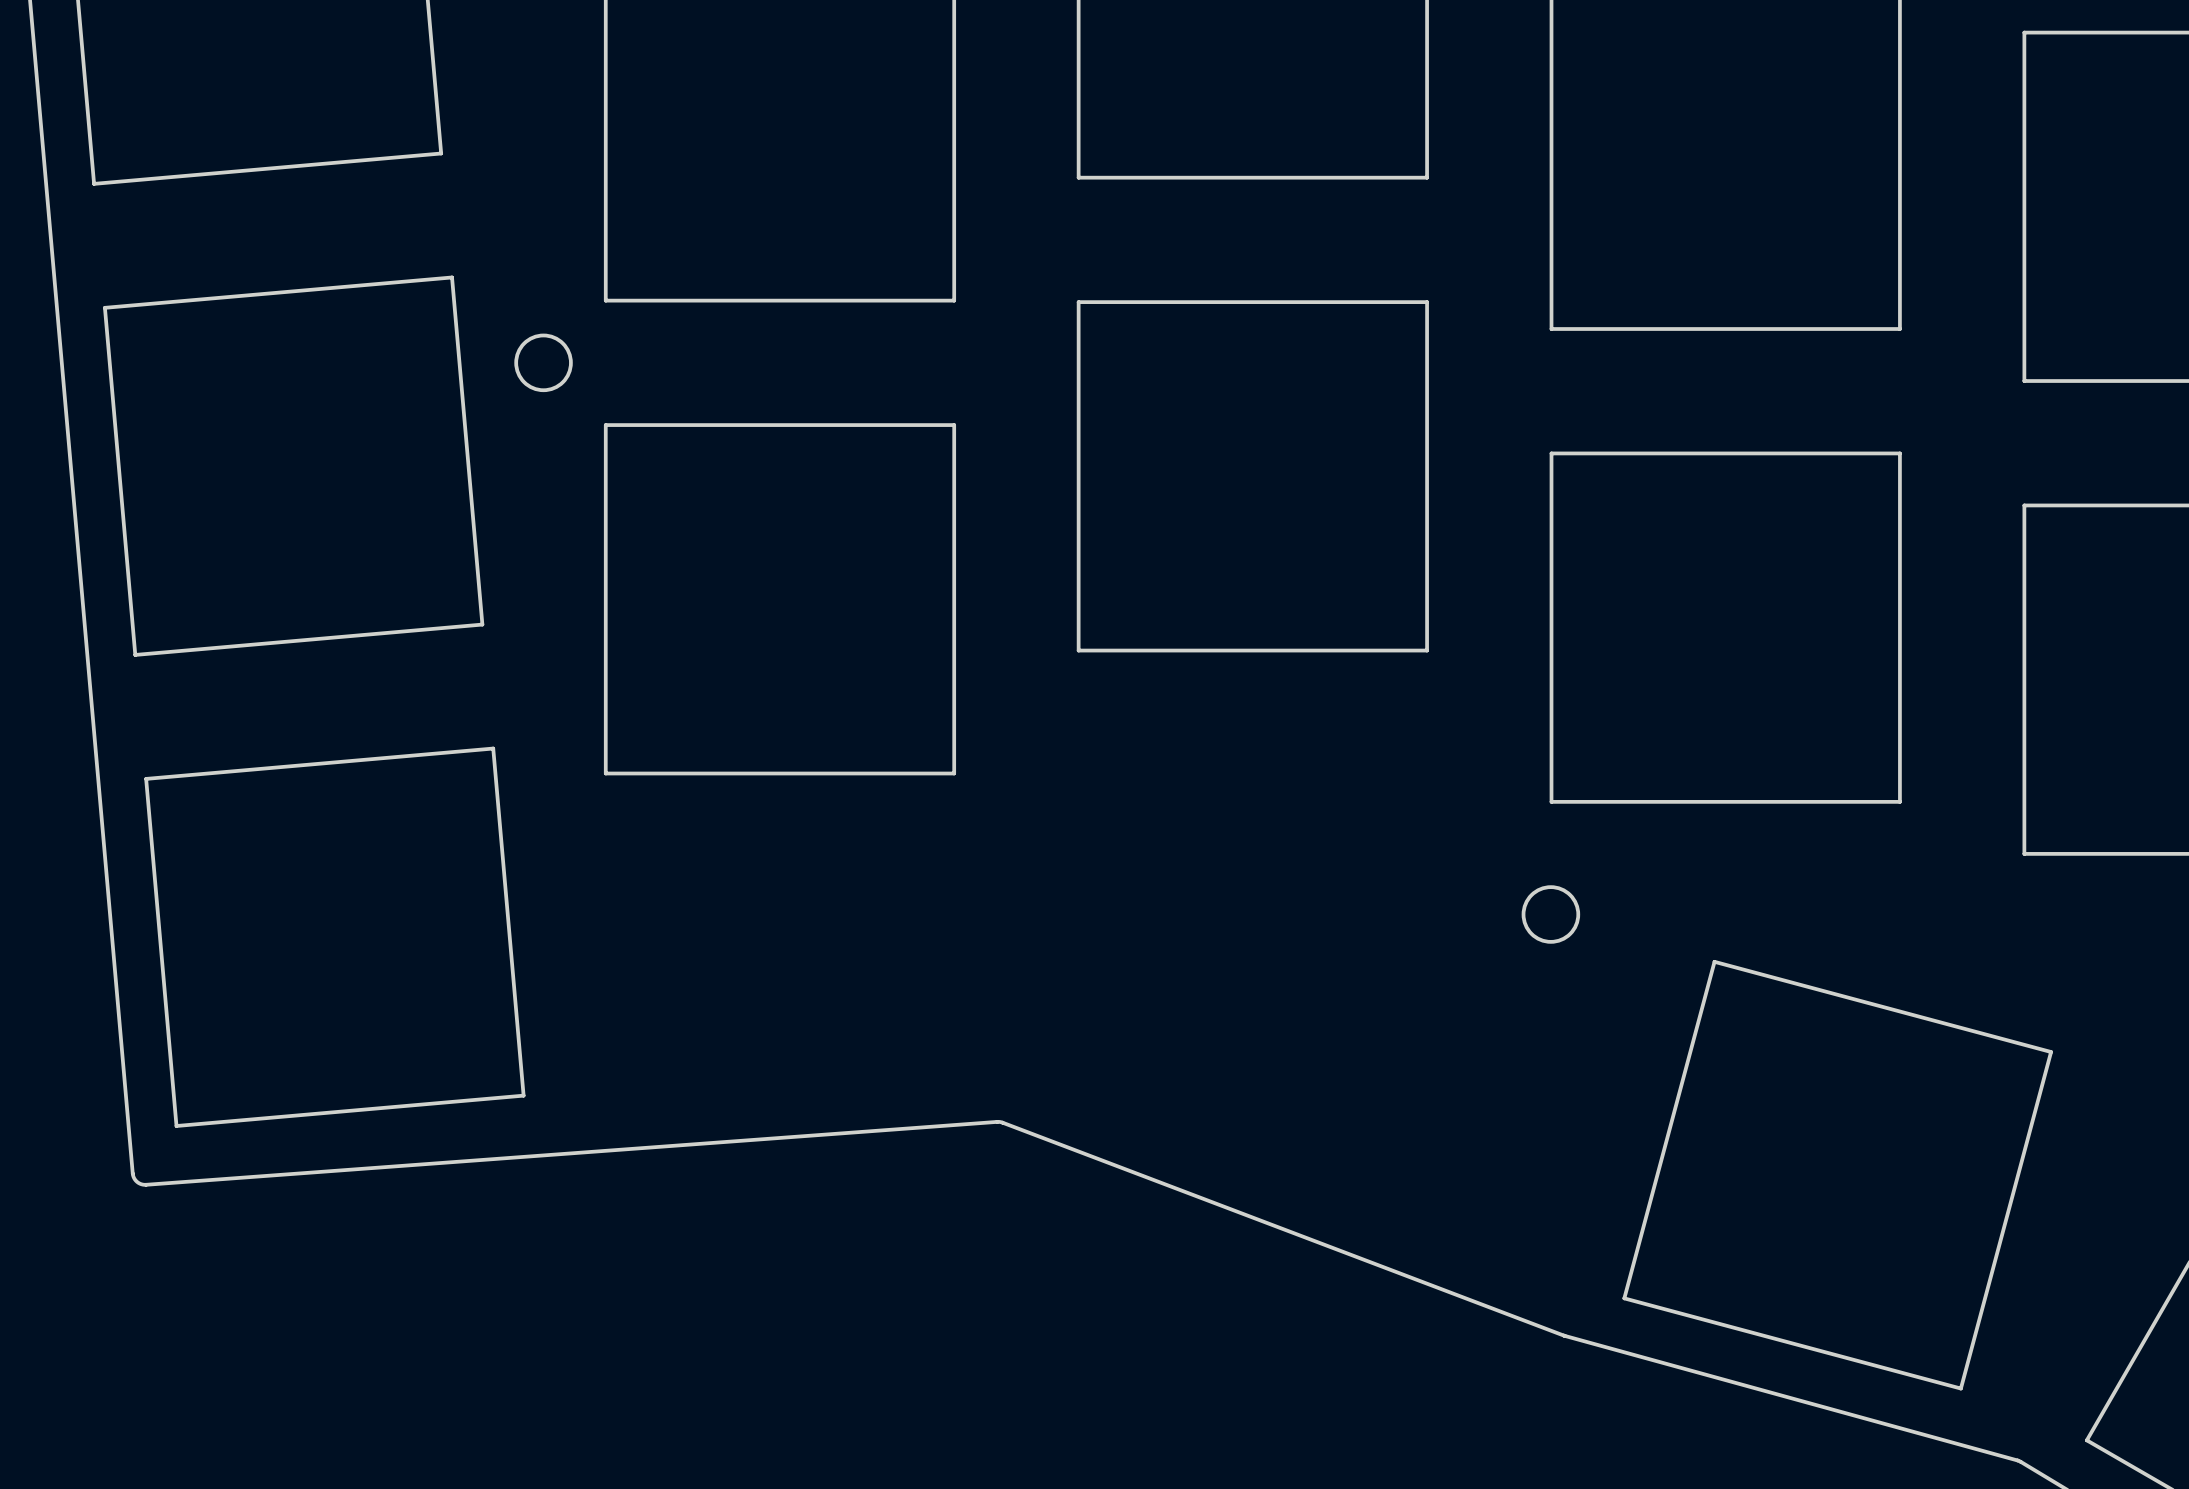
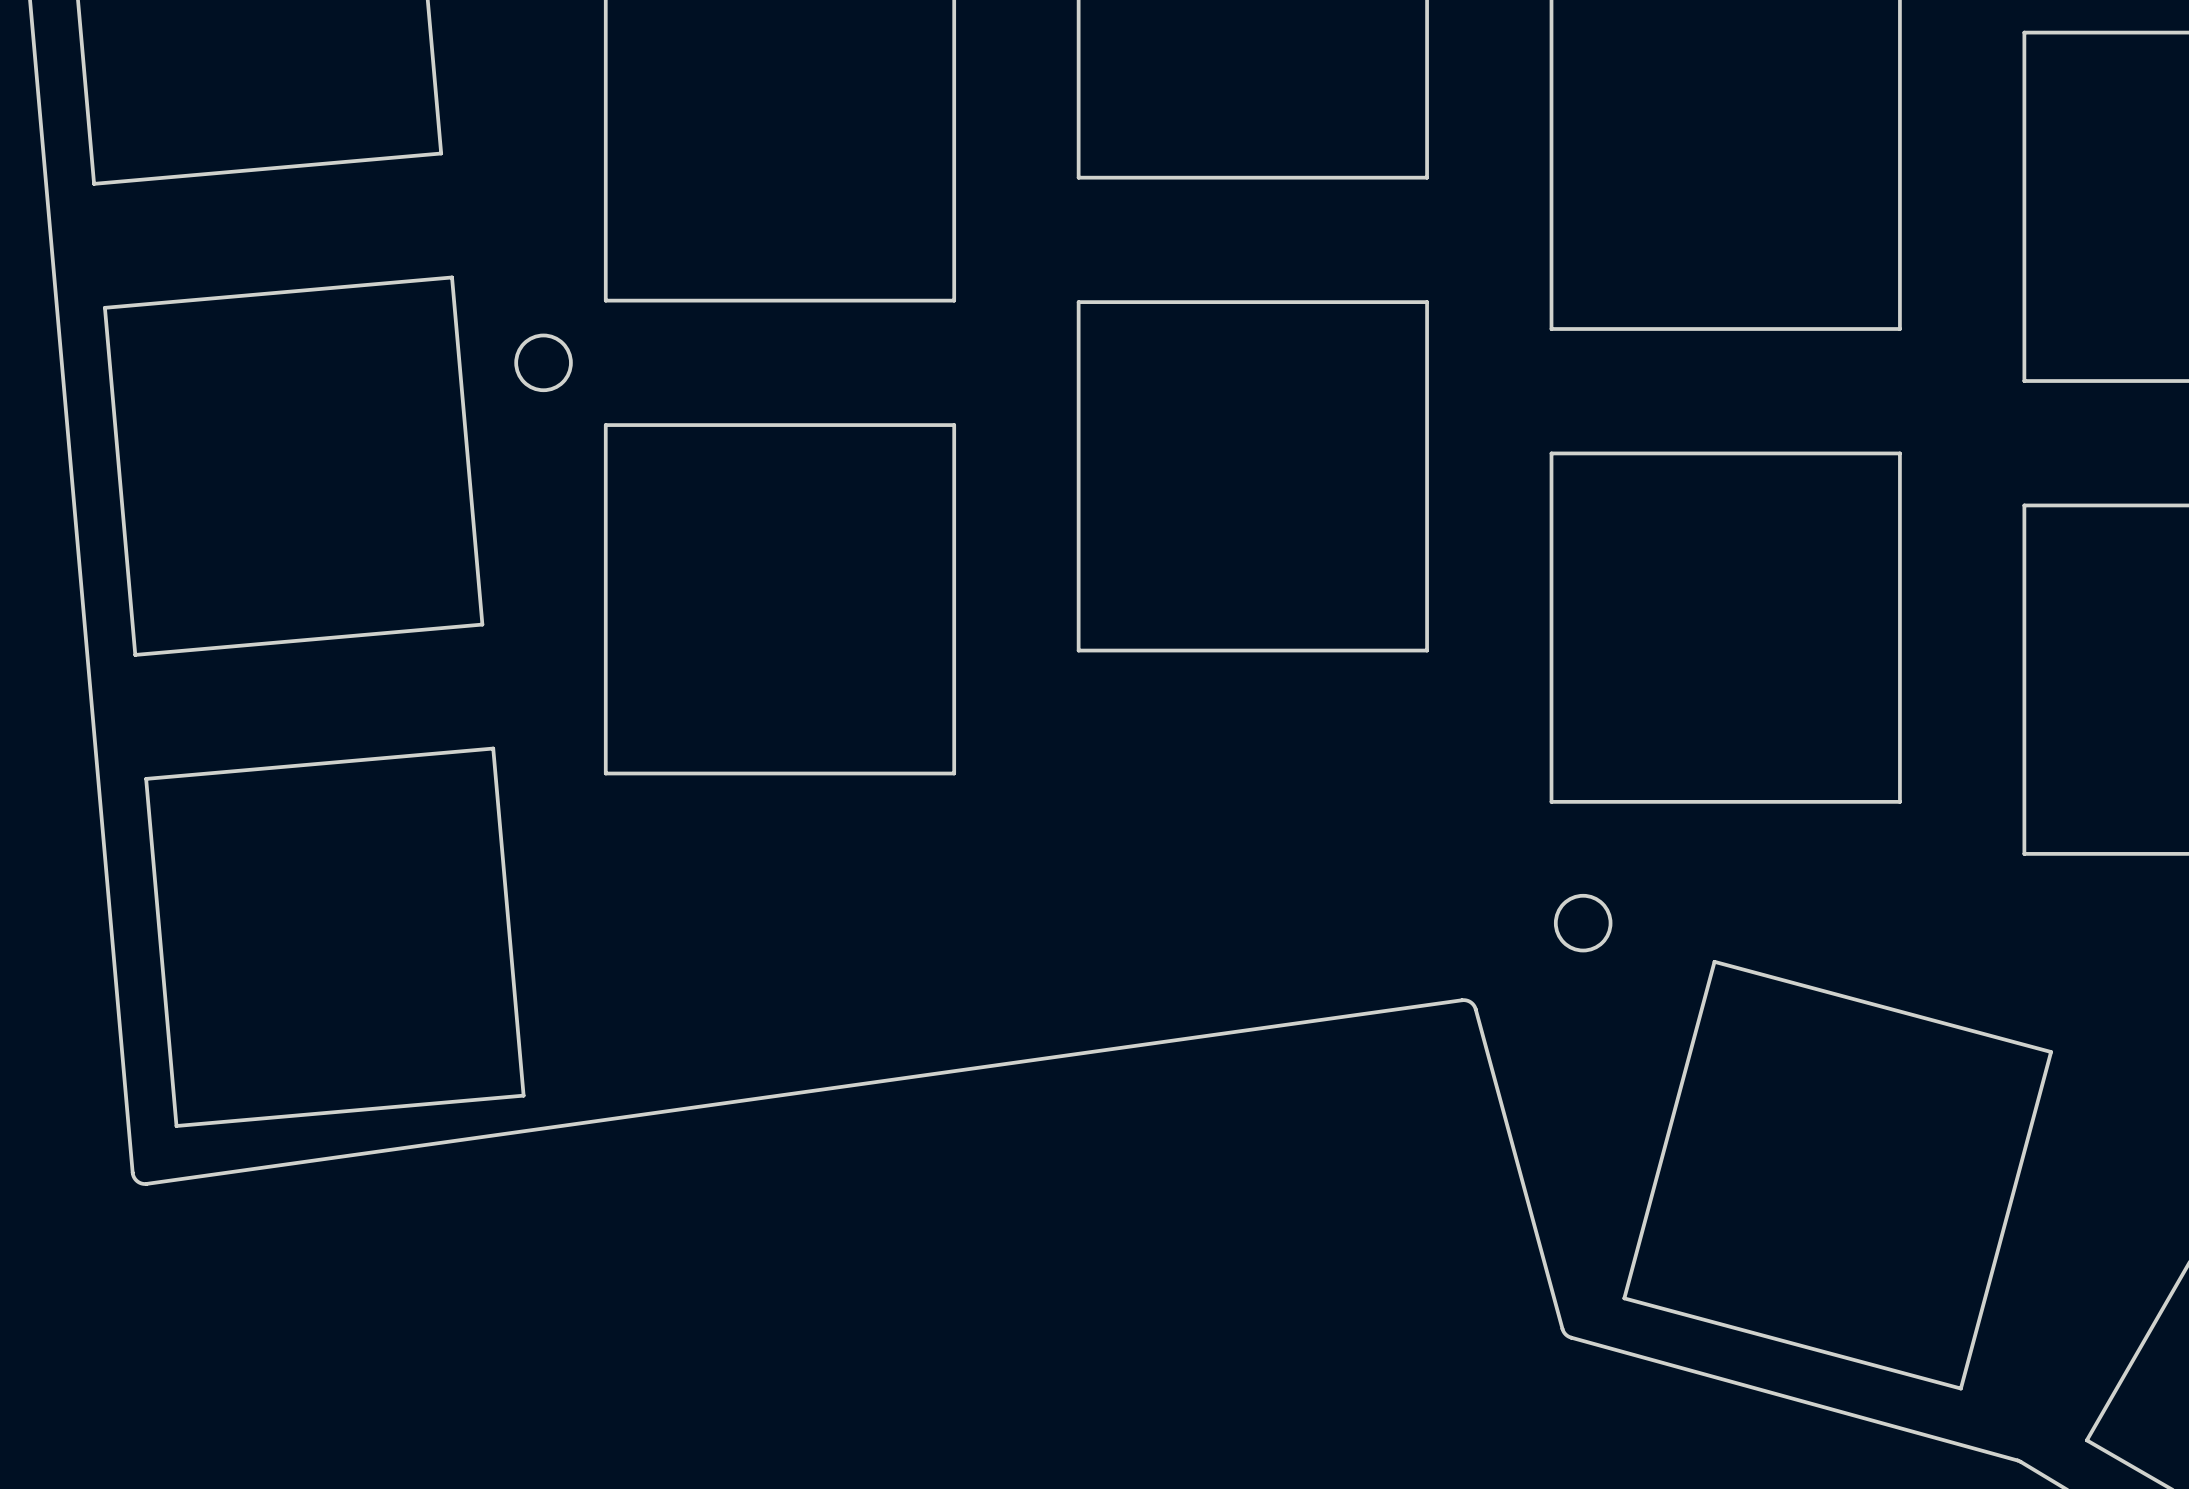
round board edge position: (1550, 914) -> (1583, 923)
board edge: (132, 1172) (137, 1181) (146, 1184) (999, 1121) (1571, 1337) -> (132, 1172) (137, 1181) (146, 1183) (1464, 1000) (1471, 1003) (1475, 1009) (1562, 1328) (1565, 1334) (1571, 1337)

